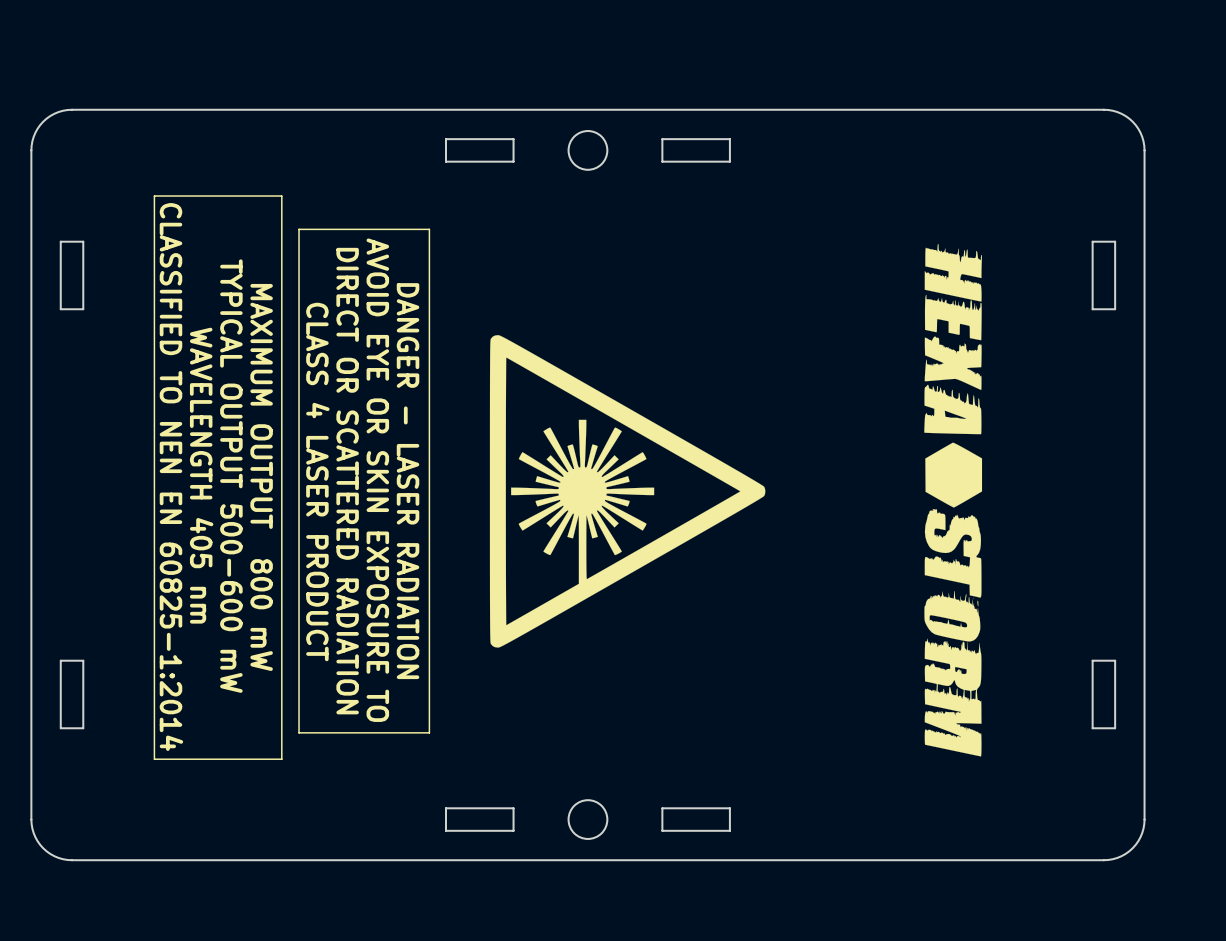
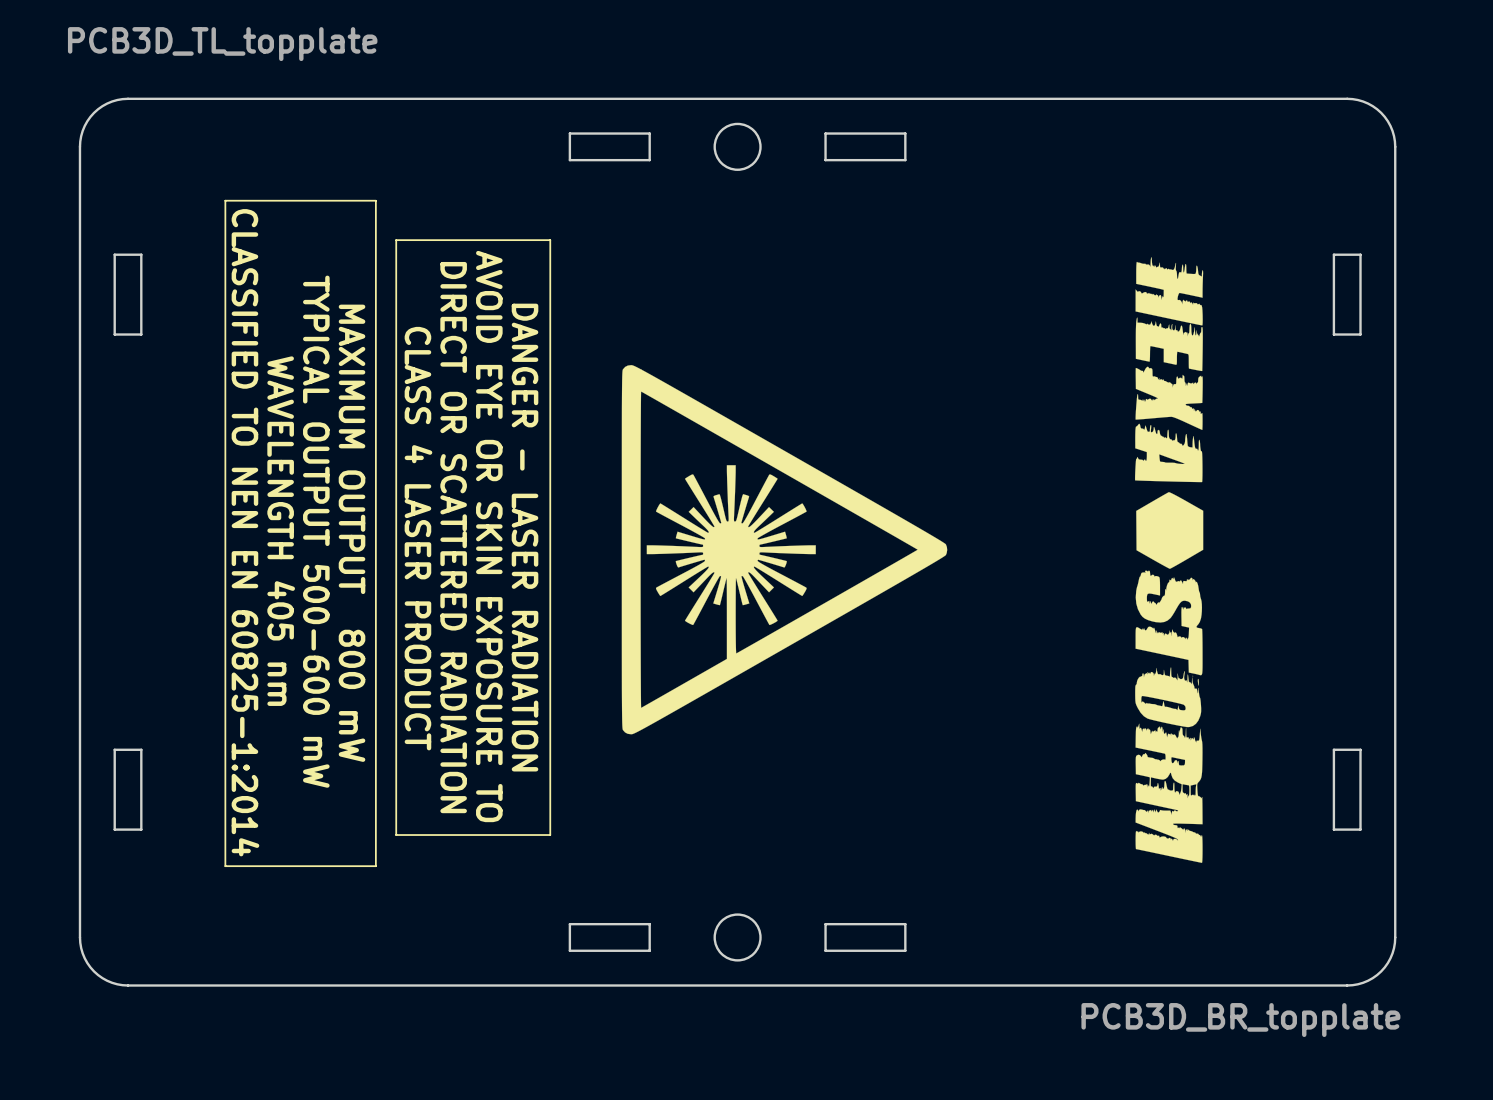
text: none -> PCB3D_TL_topplate (222, 44)
text: none -> PCB3D_BR_topplate (1240, 1020)

